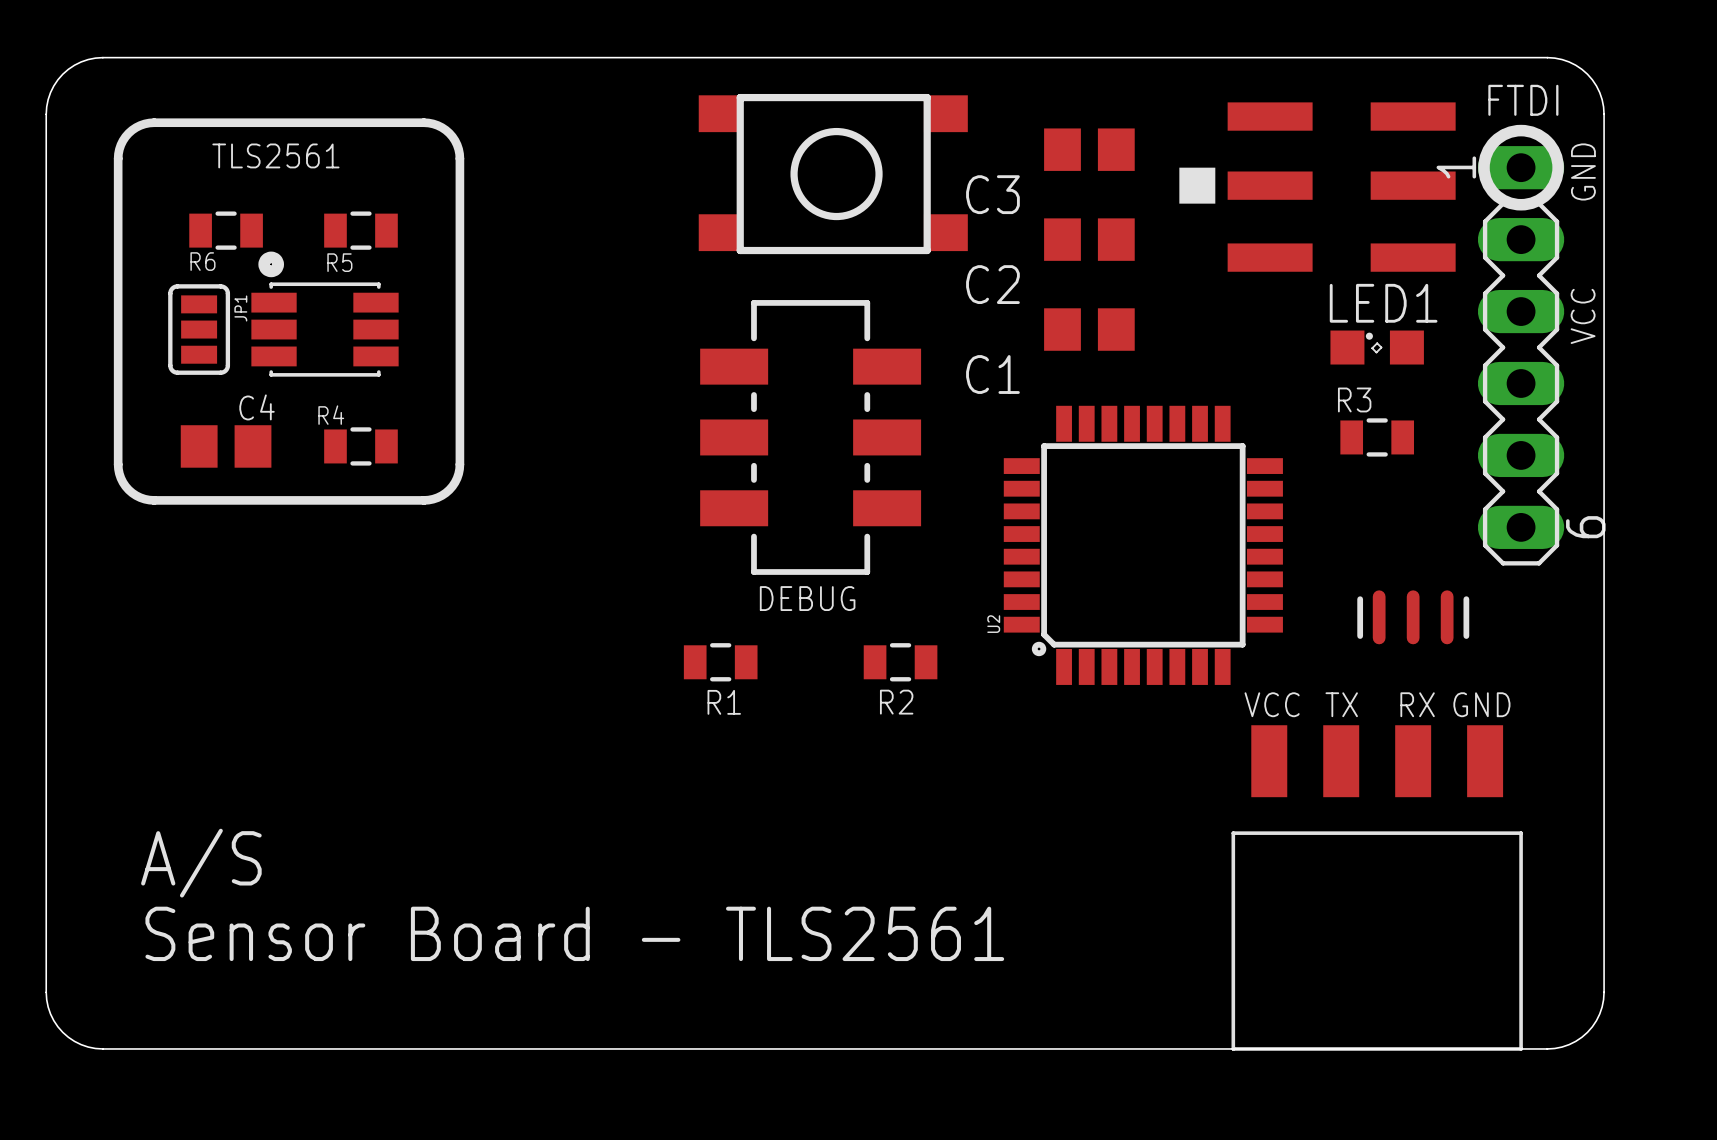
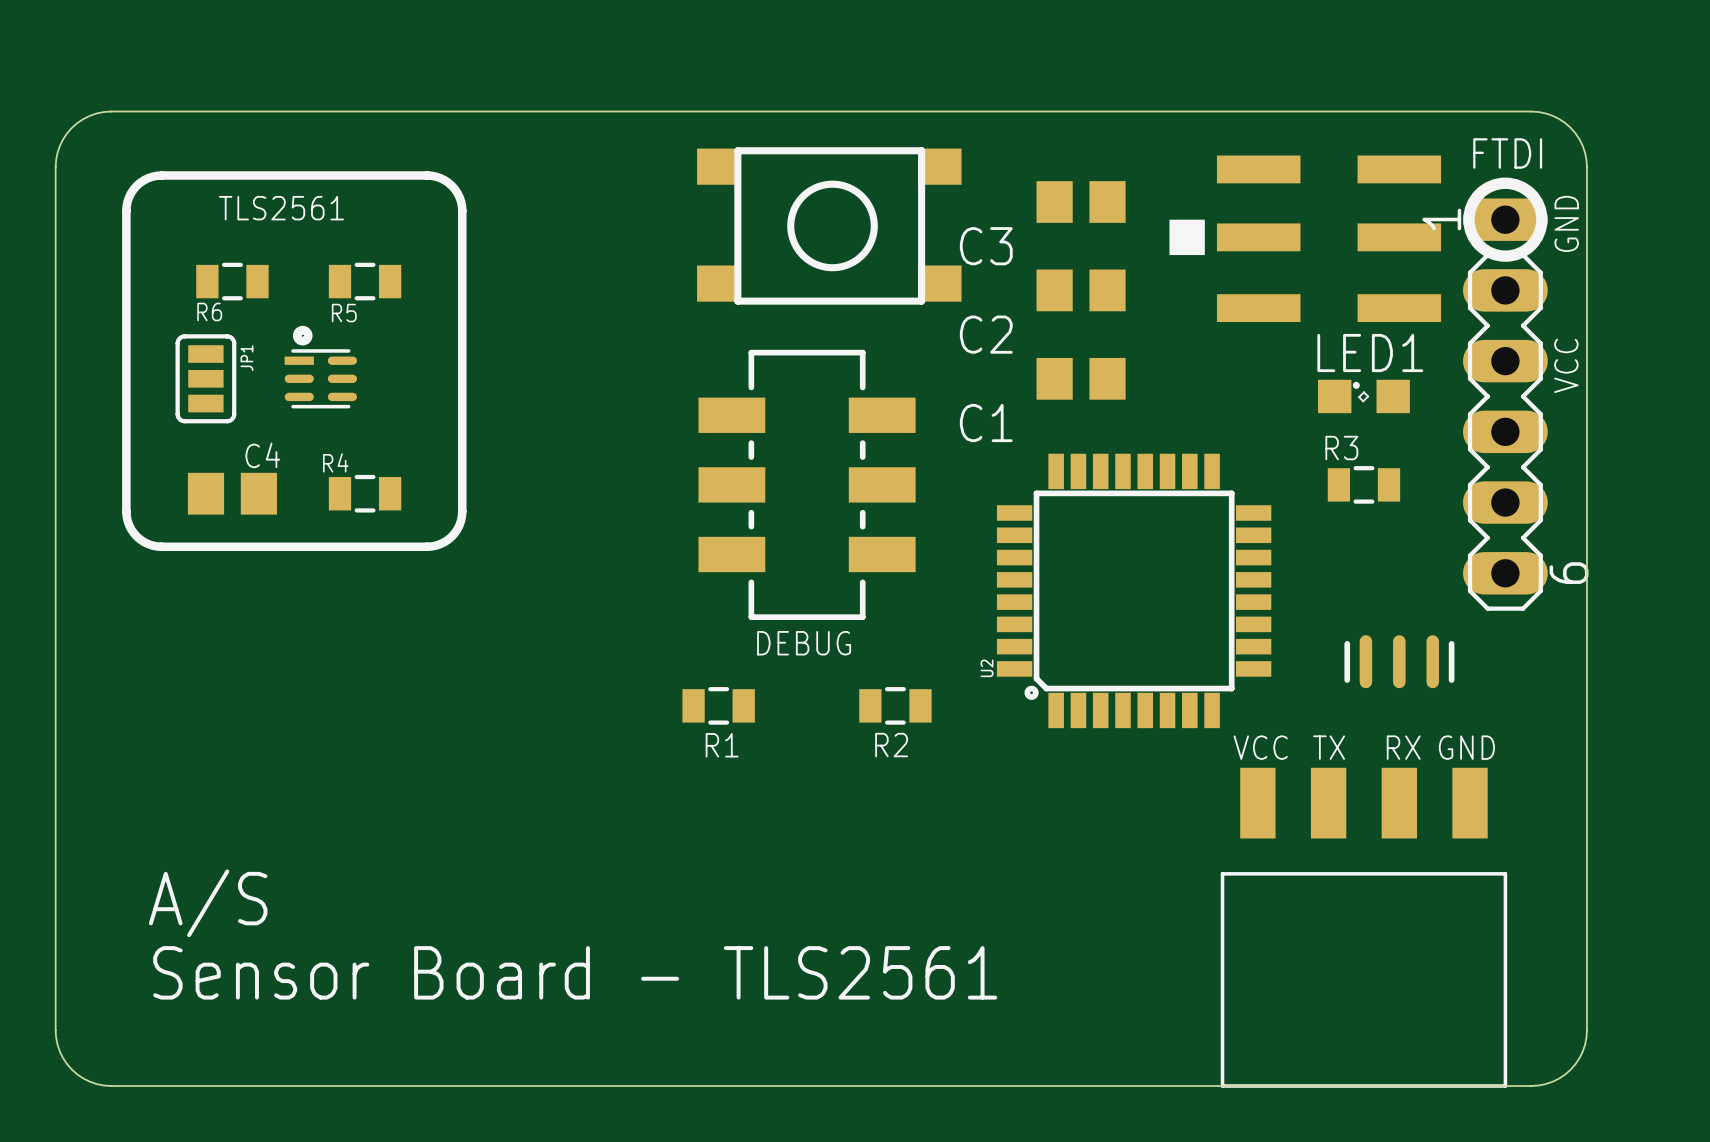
part footprint: [251, 251, 399, 377] -> [284, 325, 358, 409]

